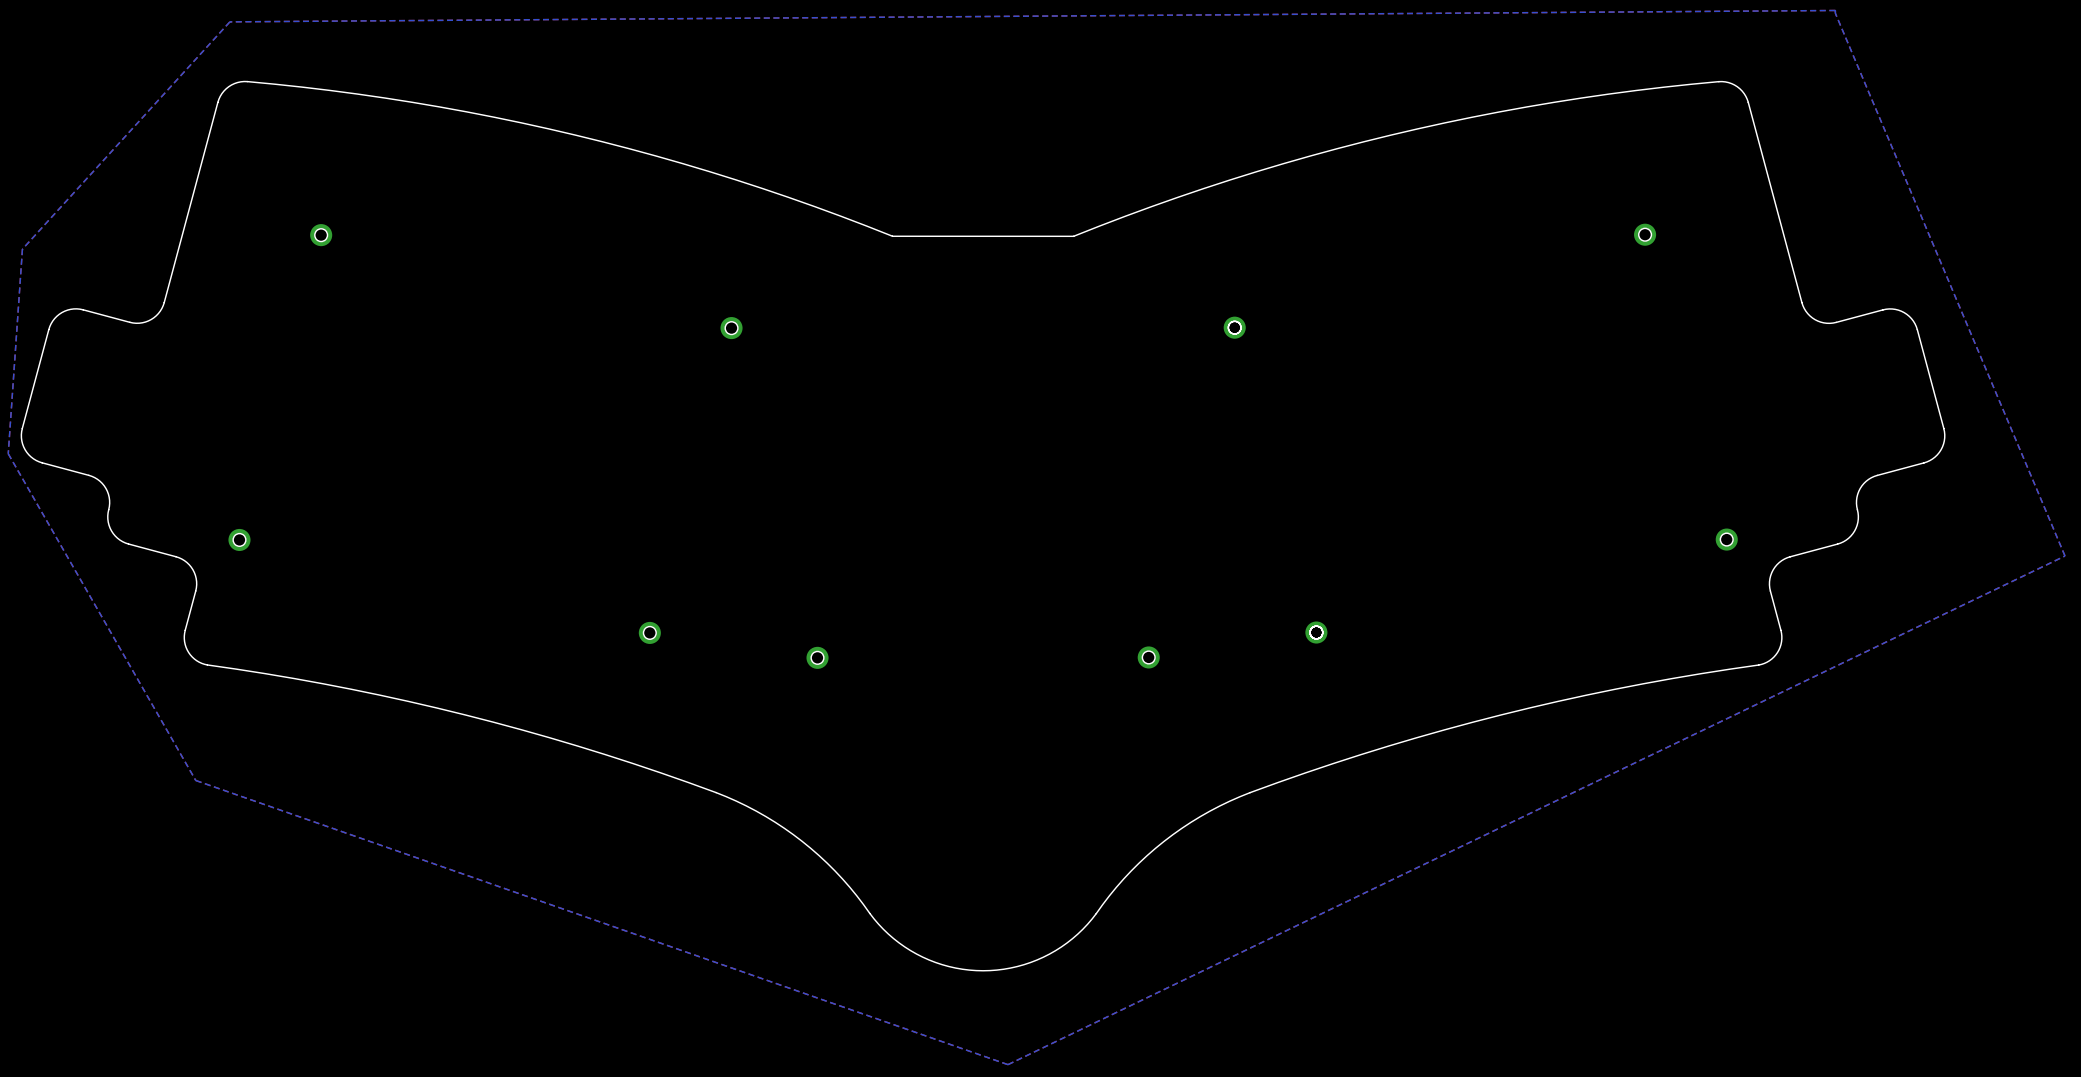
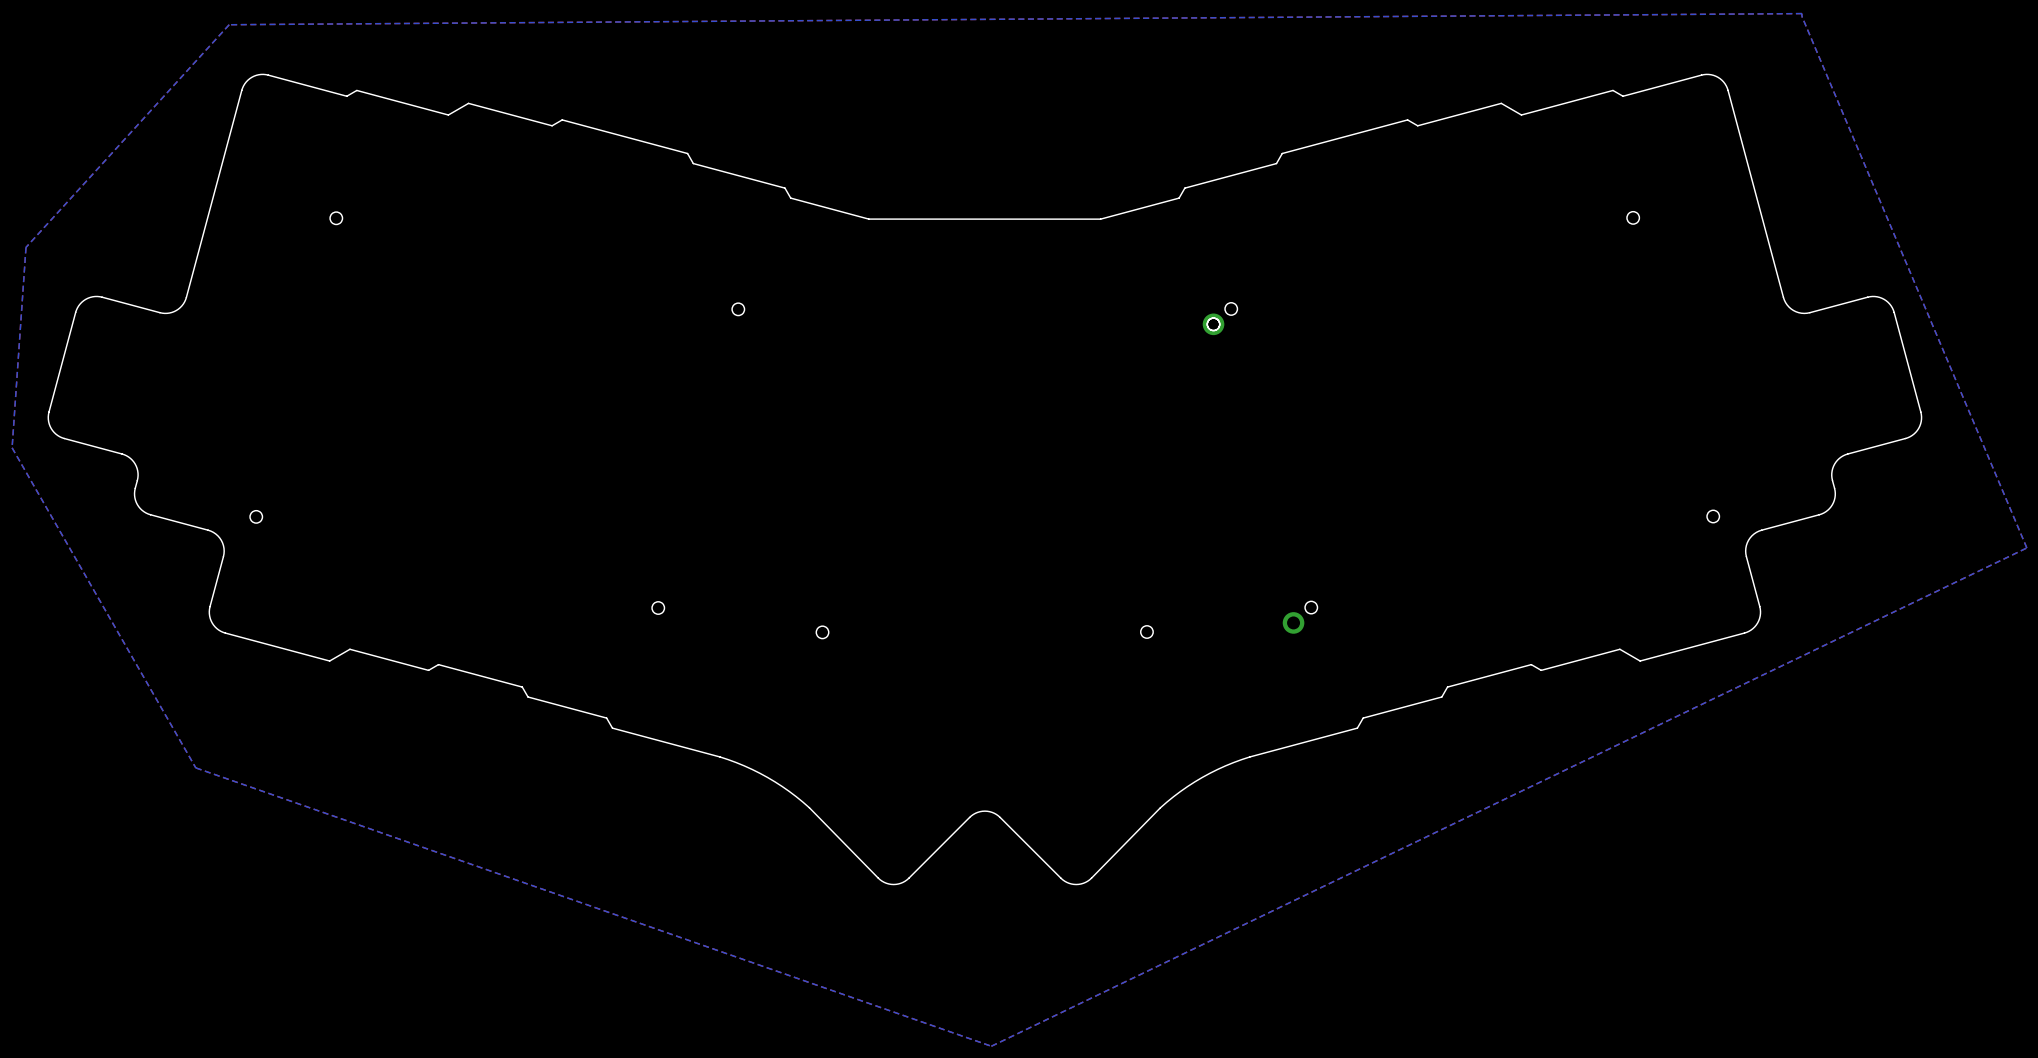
board edge: (247, 81) (231, 84) (223, 91) (218, 99) (164, 302) (158, 313) (148, 320) (136, 323) (73, 308) (61, 312) (51, 323) (21, 431) (21, 440) (26, 452) (39, 461) (88, 475) (99, 481) (105, 488) (109, 497) (109, 525) (113, 533) (120, 540) (178, 557) (191, 567) (196, 578) (196, 587) (184, 638) (188, 652) (199, 662) (351, 689) (465, 714) (605, 754) (726, 796) (765, 816) (810, 848) (842, 878) (878, 924) (899, 942) (922, 957) (955, 968) (983, 970) (1003, 969) (1030, 962) (1055, 950) (1082, 929) (1123, 878) (1164, 841) (1210, 811) (1250, 792) (1360, 754) (1500, 714) (1614, 689) (1766, 662) (1777, 652) (1781, 638) (1769, 588) (1769, 578) (1774, 567) (1787, 557) (1846, 540) (1852, 533) (1857, 525) (1856, 497) (1863, 483) (1874, 476) (1929, 460) (1939, 452) (1944, 441) (1943, 428) (1917, 329) (1909, 316) (1901, 311) (1889, 308) (1826, 323) (1814, 319) (1805, 311) (1747, 99) (1739, 88) (1725, 81) (1663, 87) (1553, 102) (1471, 117) (1390, 135) (1310, 156) (1230, 179) (1151, 206) (1073, 236) (892, 236) (814, 206) (735, 179) (656, 156) (575, 135) (494, 117) (412, 102) (330, 90) (247, 81) -> (1701, 75) (1711, 74) (1717, 77) (1727, 88) (1785, 302) (1793, 310) (1804, 313) (1870, 296) (1879, 297) (1888, 302) (1894, 312) (1920, 412) (1921, 421) (1917, 430) (1907, 437) (1847, 454) (1839, 458) (1833, 466) (1831, 473) (1835, 490) (1834, 500) (1825, 511) (1759, 531) (1750, 537) (1746, 545) (1745, 553) (1760, 611) (1757, 623) (1749, 631) (1640, 661) (1619, 649) (1541, 670) (1531, 664) (1447, 687) (1441, 697) (1363, 718) (1357, 728) (1233, 762) (1202, 777) (1173, 796) (1091, 878) (1081, 883) (1071, 883) (1062, 879) (998, 815) (984, 811) (971, 815) (907, 879) (898, 883) (886, 883) (878, 878) (796, 796) (767, 777) (736, 762) (612, 728) (606, 718) (528, 697) (522, 687) (438, 664) (428, 670) (349, 649) (329, 661) (223, 632) (213, 625) (209, 613) (223, 553) (223, 545) (219, 537) (210, 531) (143, 511) (135, 500) (134, 490) (138, 473) (136, 466) (130, 458) (122, 454) (62, 437) (54, 432) (48, 421) (49, 412) (75, 312) (81, 302) (90, 297) (99, 296) (164, 313) (176, 310) (183, 303) (241, 90) (247, 80) (258, 74) (268, 75) (346, 96) (356, 90) (448, 115) (468, 103) (552, 125) (562, 119) (687, 153) (693, 163) (784, 188) (790, 198) (868, 219) (1100, 219) (1179, 198) (1184, 188) (1276, 163) (1282, 153) (1407, 119) (1417, 125) (1501, 103) (1521, 115) (1613, 90) (1623, 96) (1701, 75)
part: (1645, 234) -> none
round board edge position: (1645, 234) -> (1633, 217)
part: (321, 235) -> none
round board edge position: (321, 235) -> (336, 218)
round board edge: none -> [1224, 302, 1238, 316]
part: (731, 328) -> none
round board edge position: (731, 328) -> (738, 309)
part: (239, 539) -> none
round board edge position: (239, 539) -> (256, 516)
part: (1726, 539) -> none
round board edge position: (1726, 539) -> (1713, 516)
part: (649, 632) -> none
round board edge position: (649, 632) -> (658, 608)
round board edge position: (1316, 632) -> (1311, 607)
part: (817, 657) -> none
round board edge position: (817, 657) -> (822, 632)
part: (1148, 657) -> none
round board edge position: (1148, 657) -> (1146, 632)

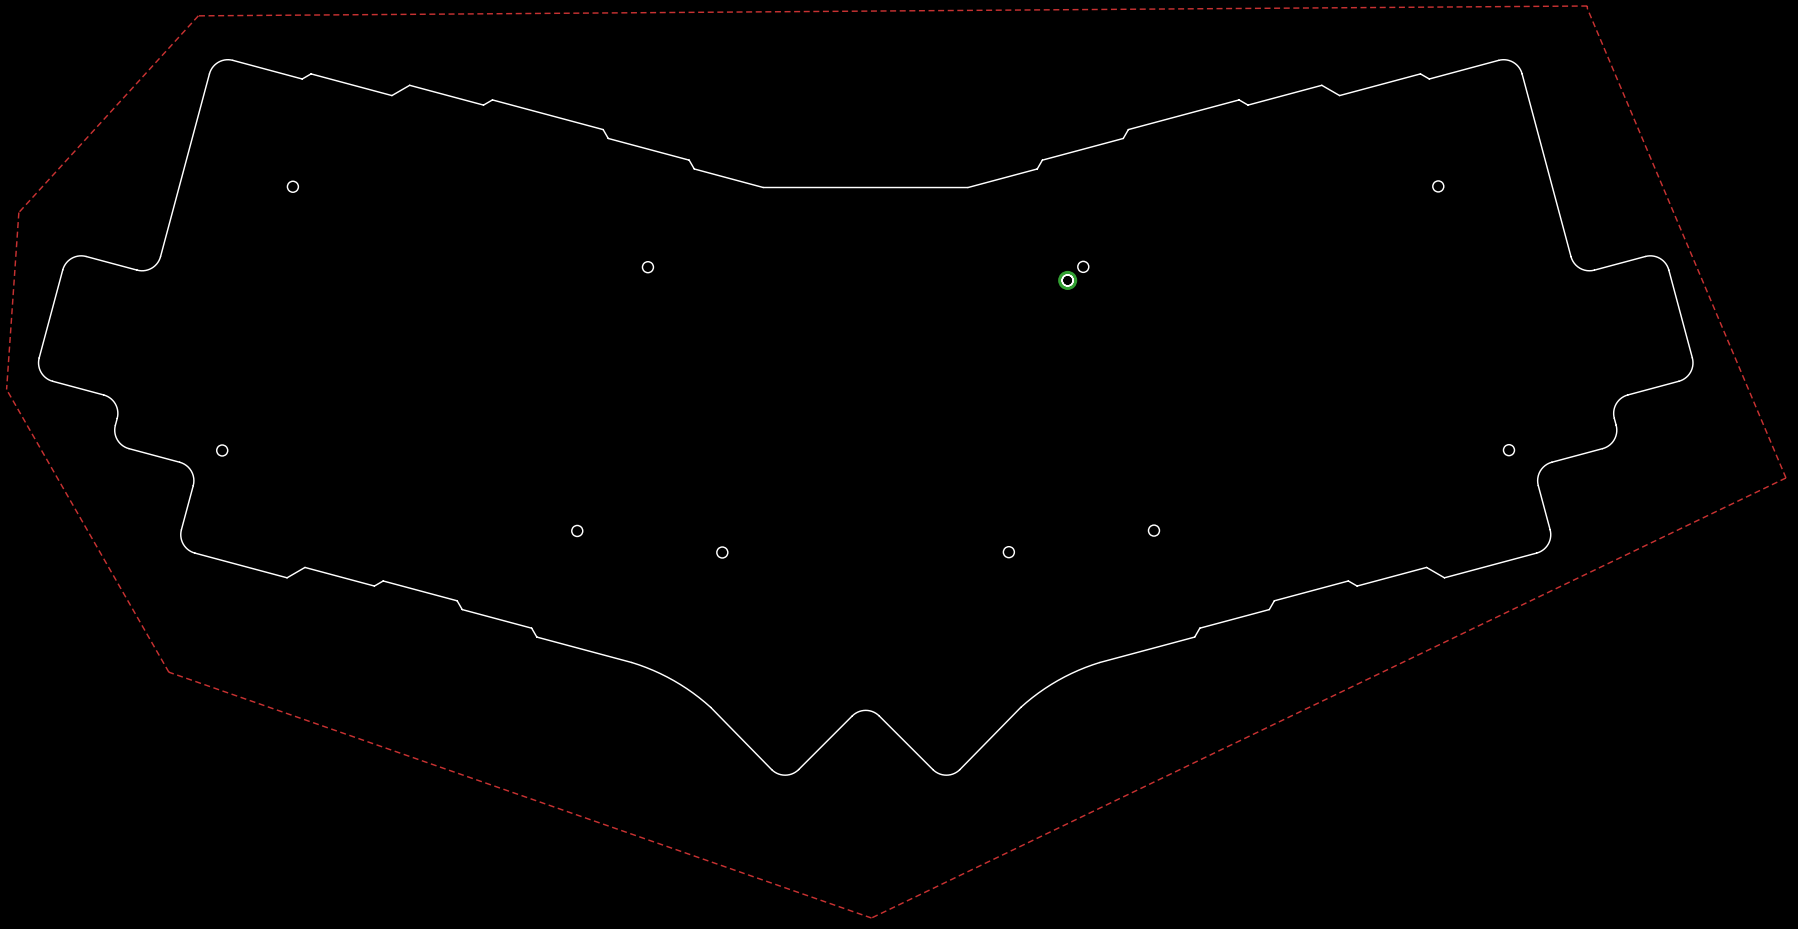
bottom zone outline: (1801, 13) (229, 24) (25, 247) (12, 447) (195, 767) (991, 1046) (2026, 547) (1801, 13) -> none
part: (1293, 622) -> none

